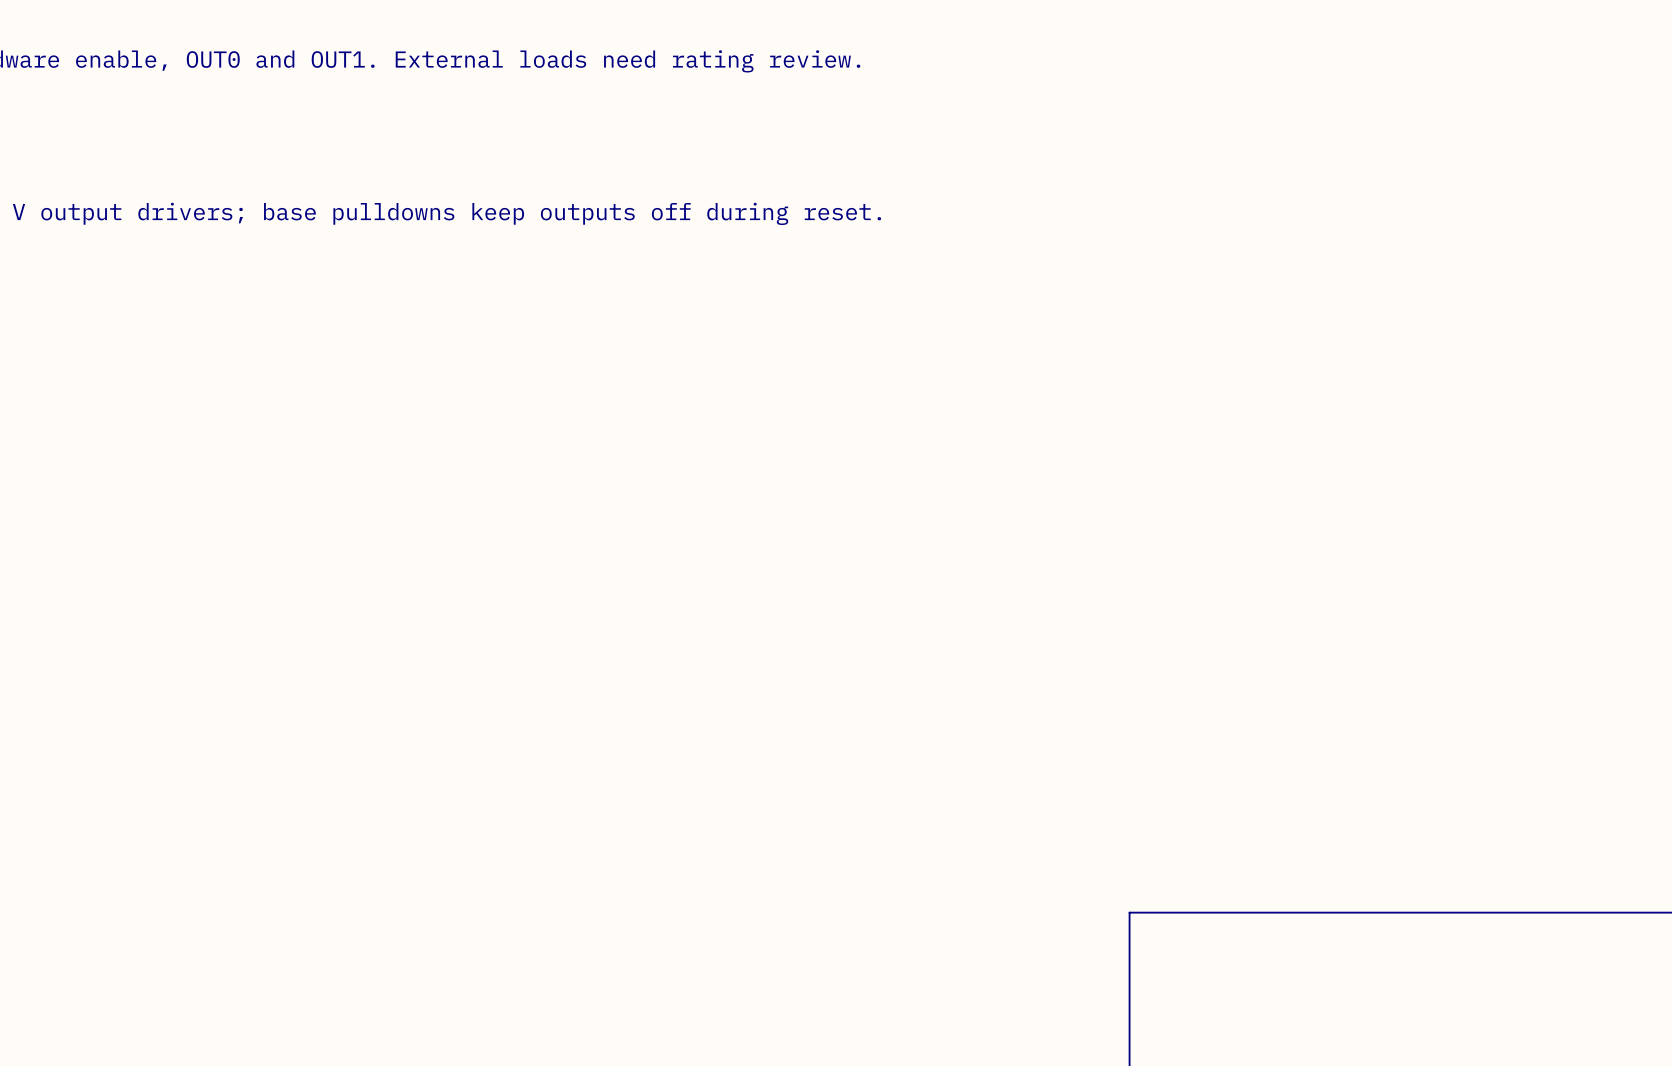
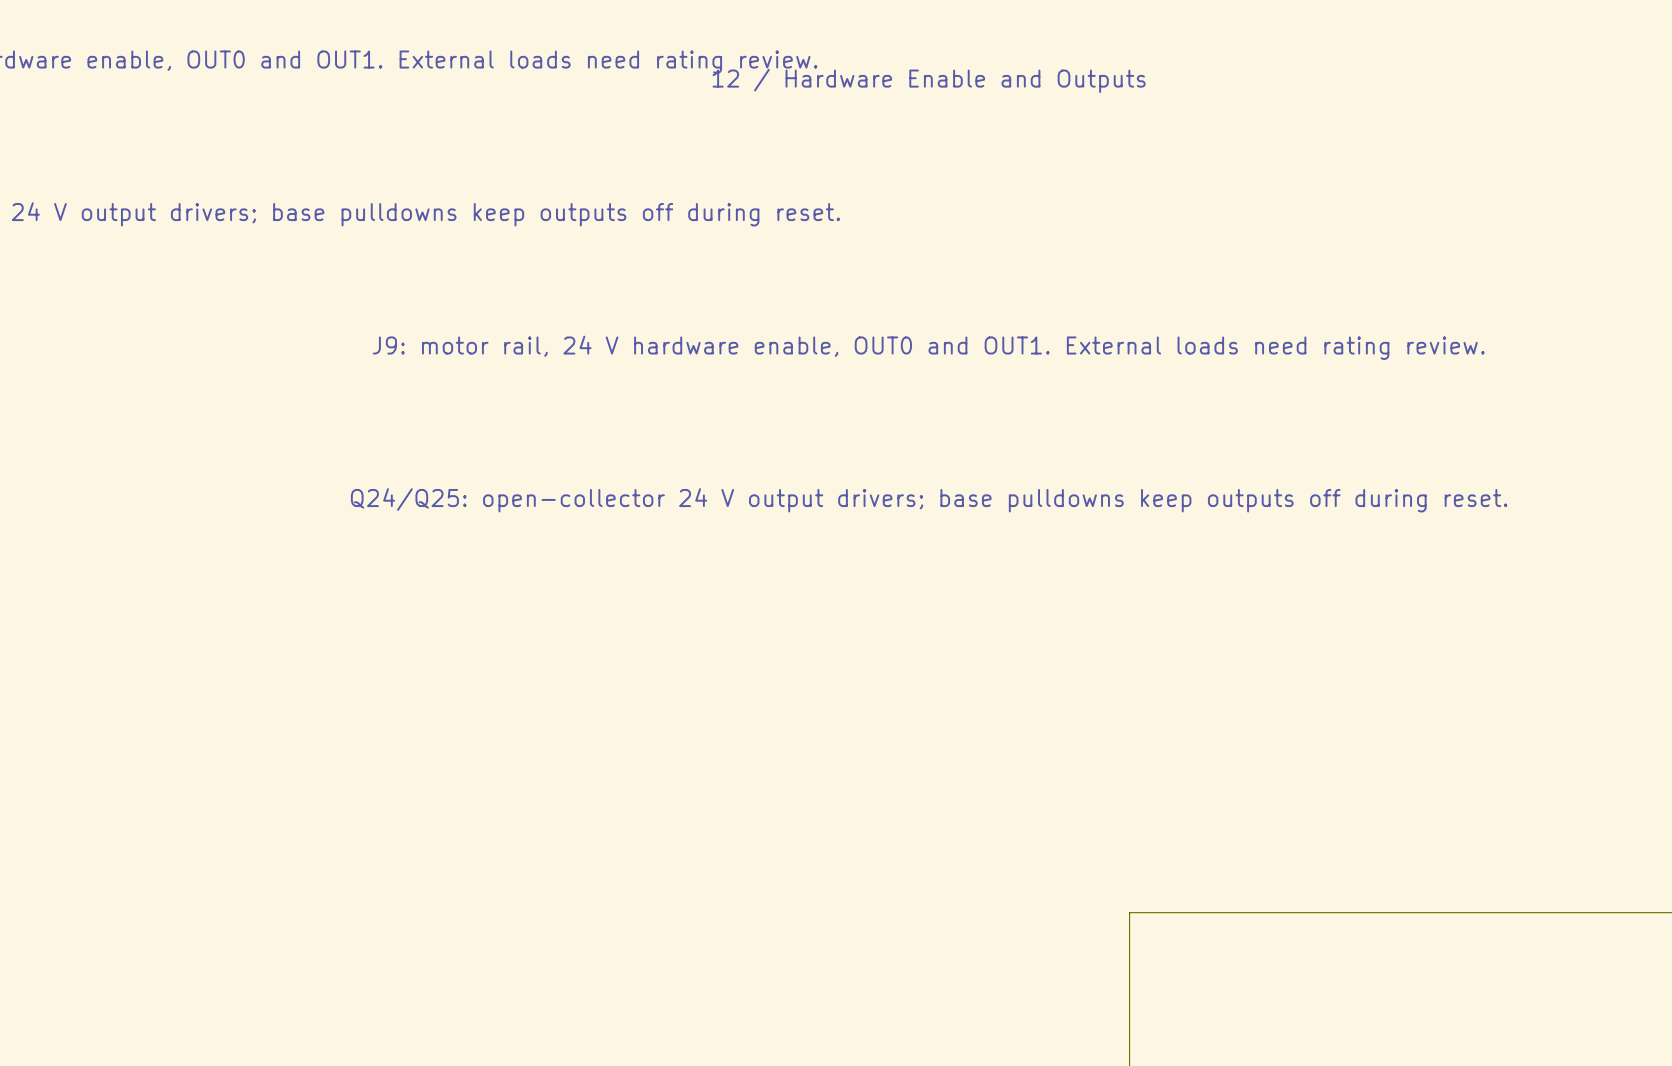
text: none -> 12 / Hardware Enable and Outputs (929, 80)
text: none -> J9: motor rail, 24 V hardware enable, OUT0 and OUT1. External loads need rating review. (928, 347)
text: none -> Q24/Q25: open-collector 24 V output drivers; base pulldowns keep outputs off during reset. (929, 500)

